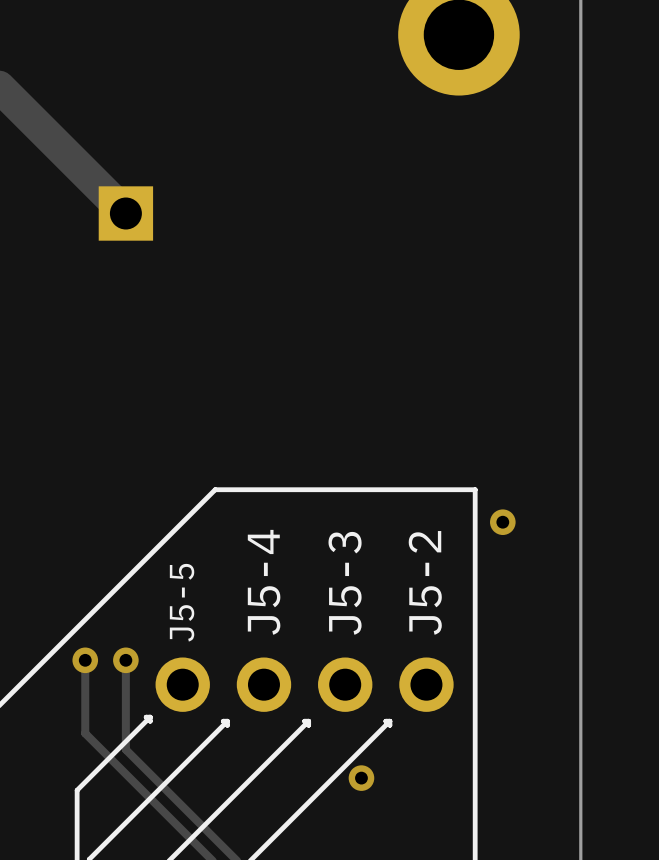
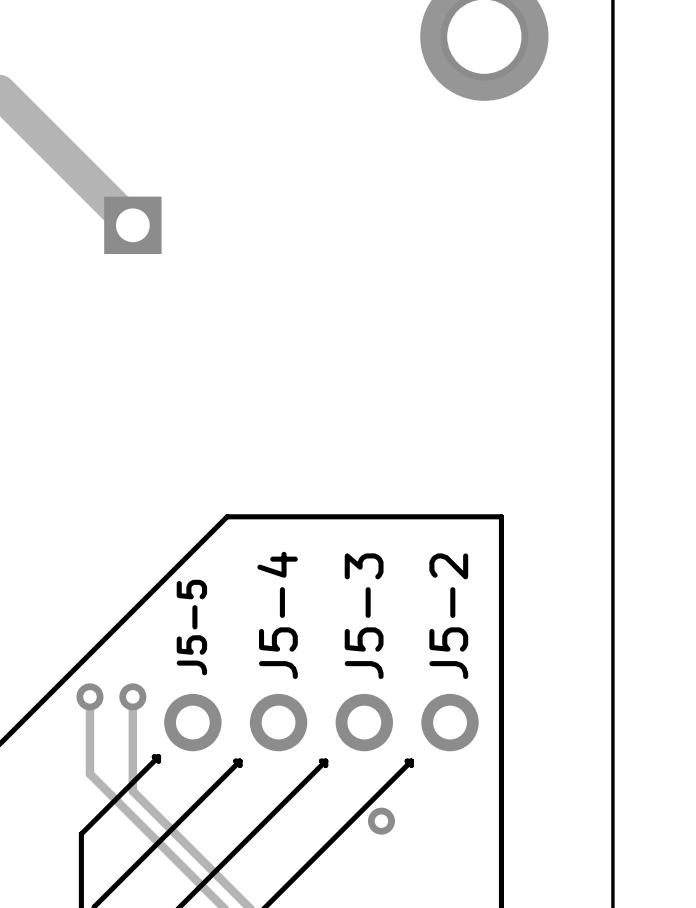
via: (502, 522) -> none

